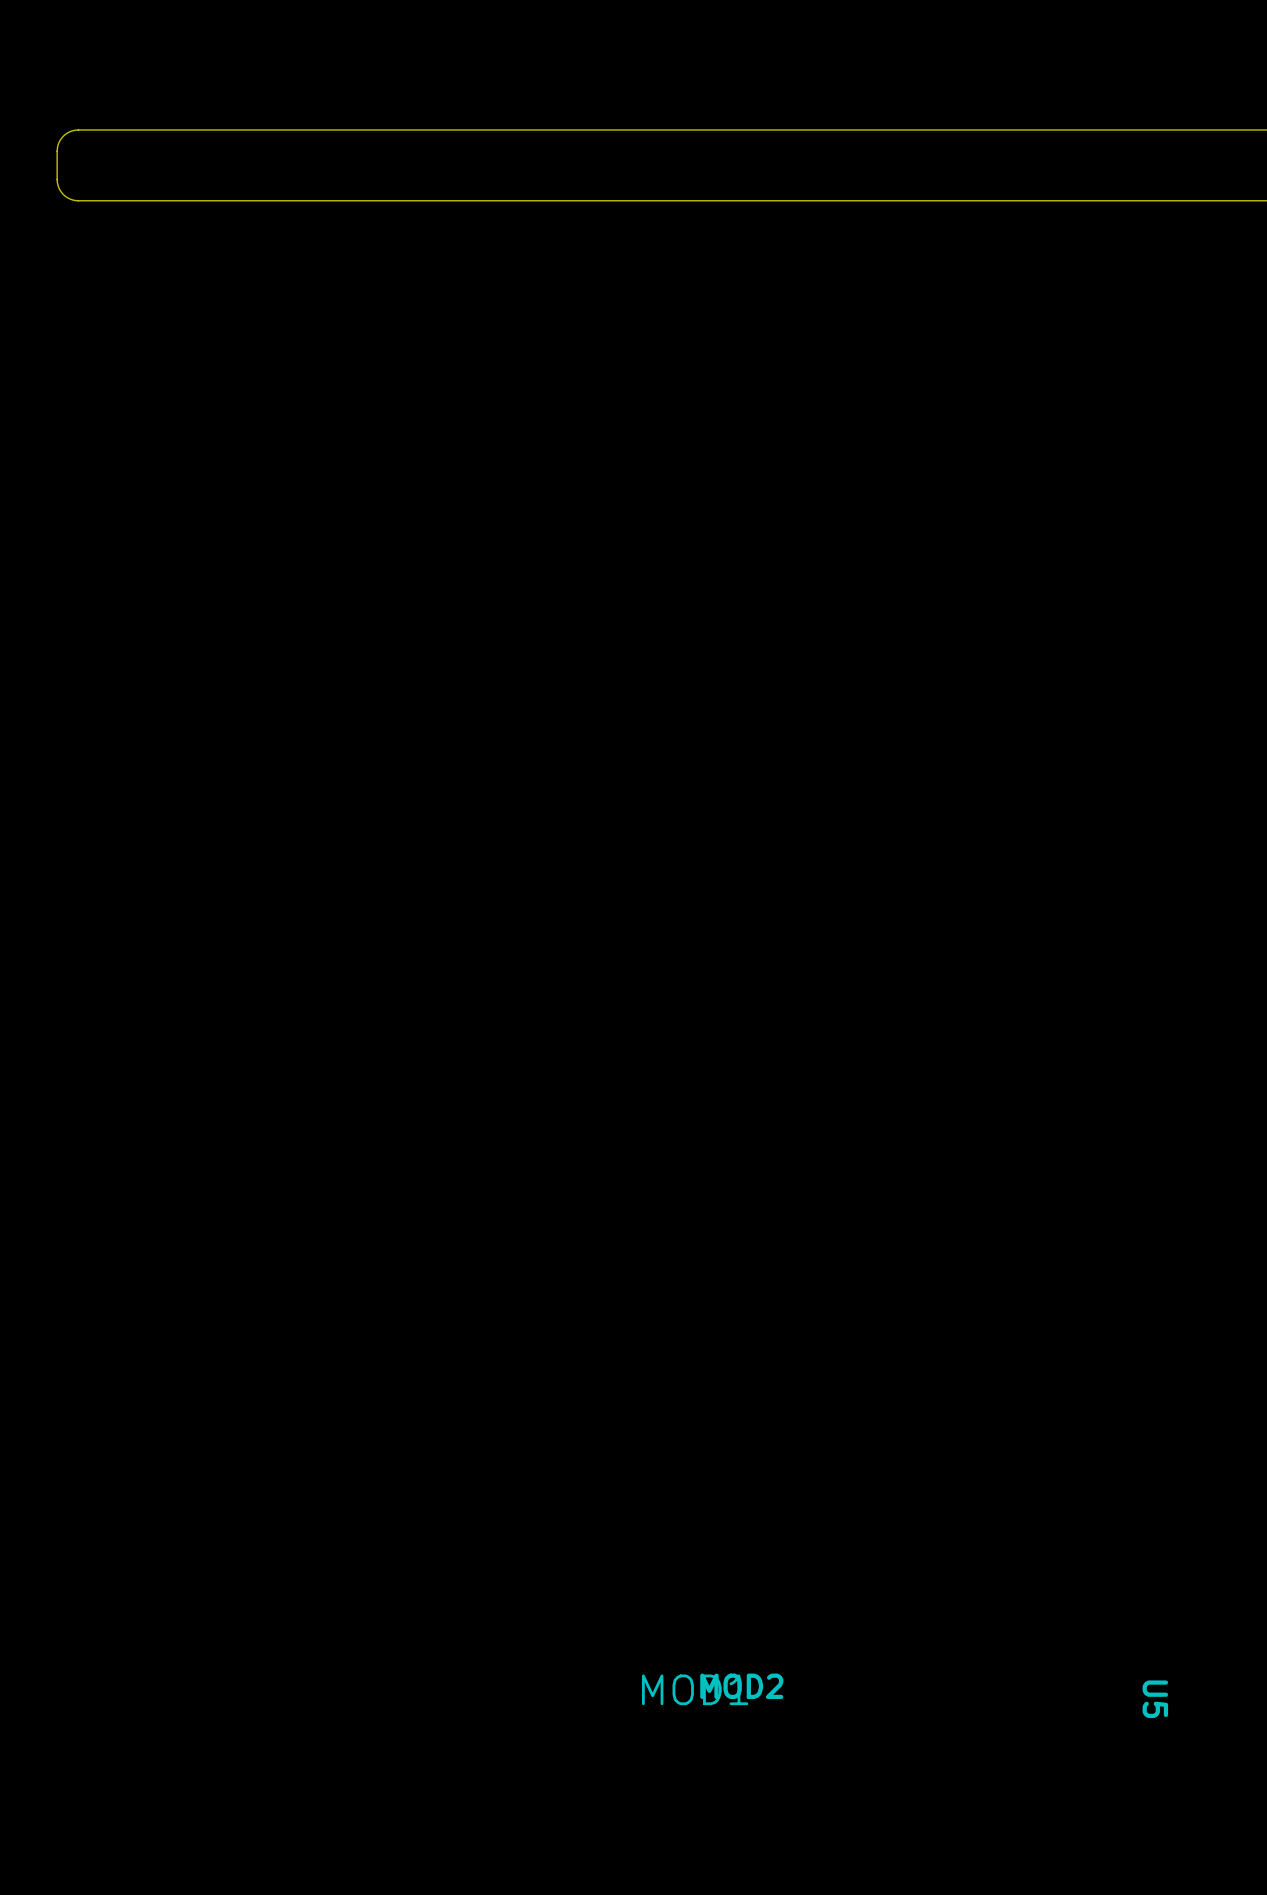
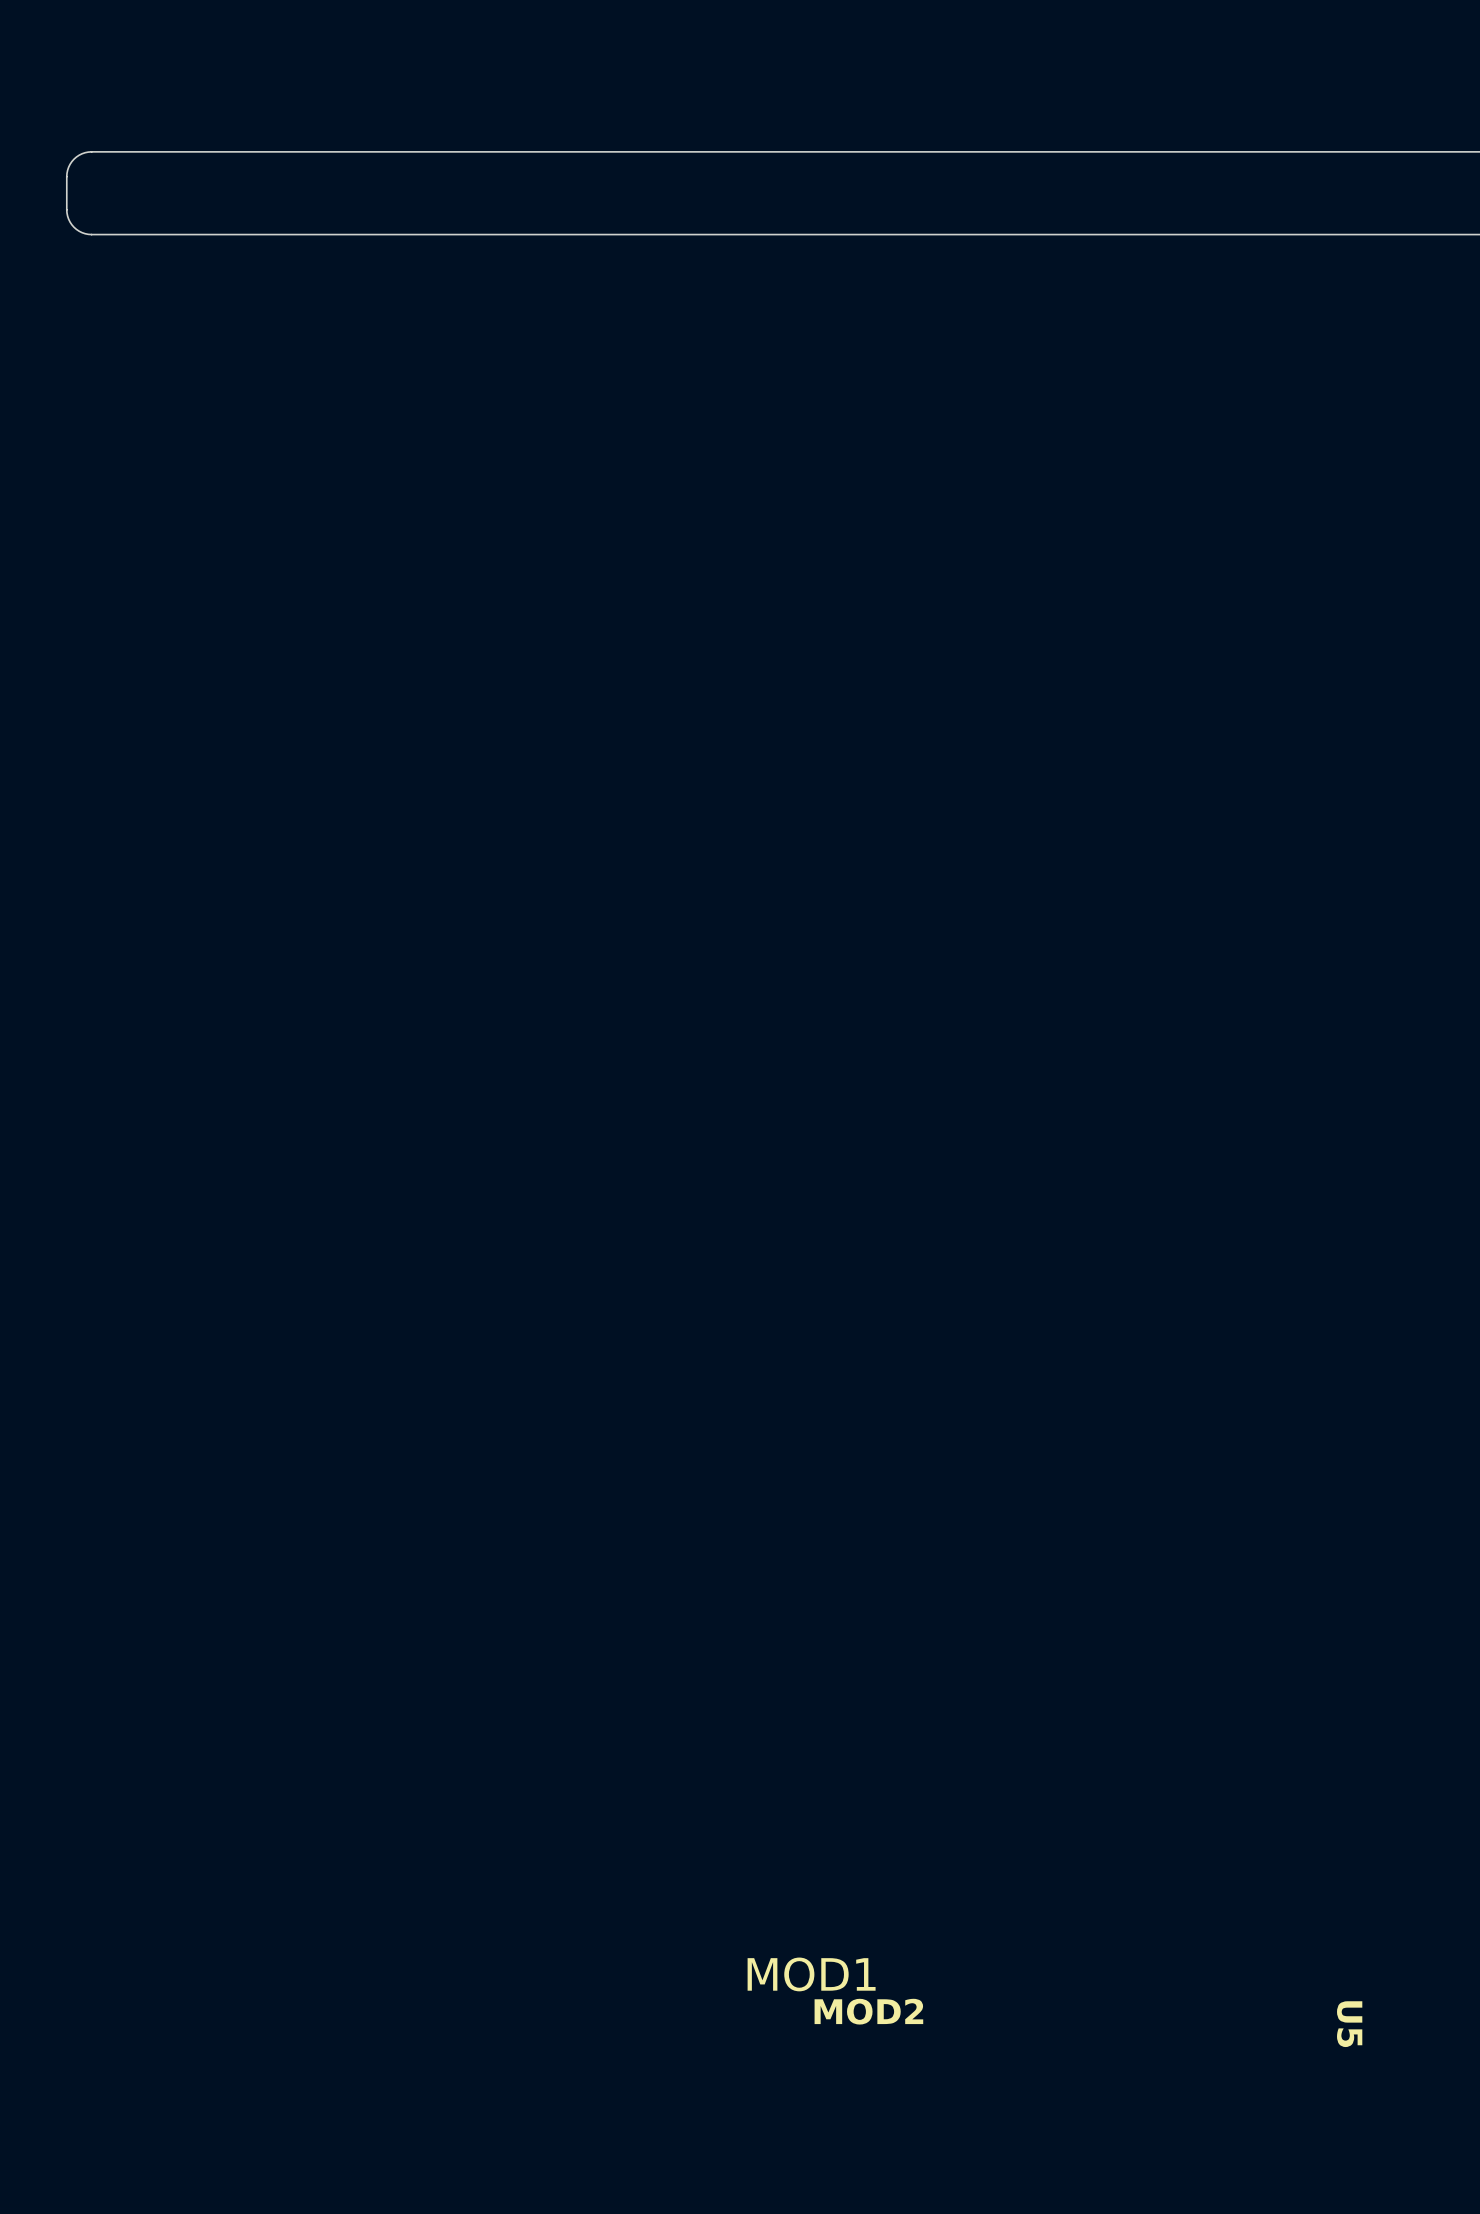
MOD2 position: (741, 1686) -> (868, 2011)
U5 position: (1155, 1699) -> (1349, 2024)

